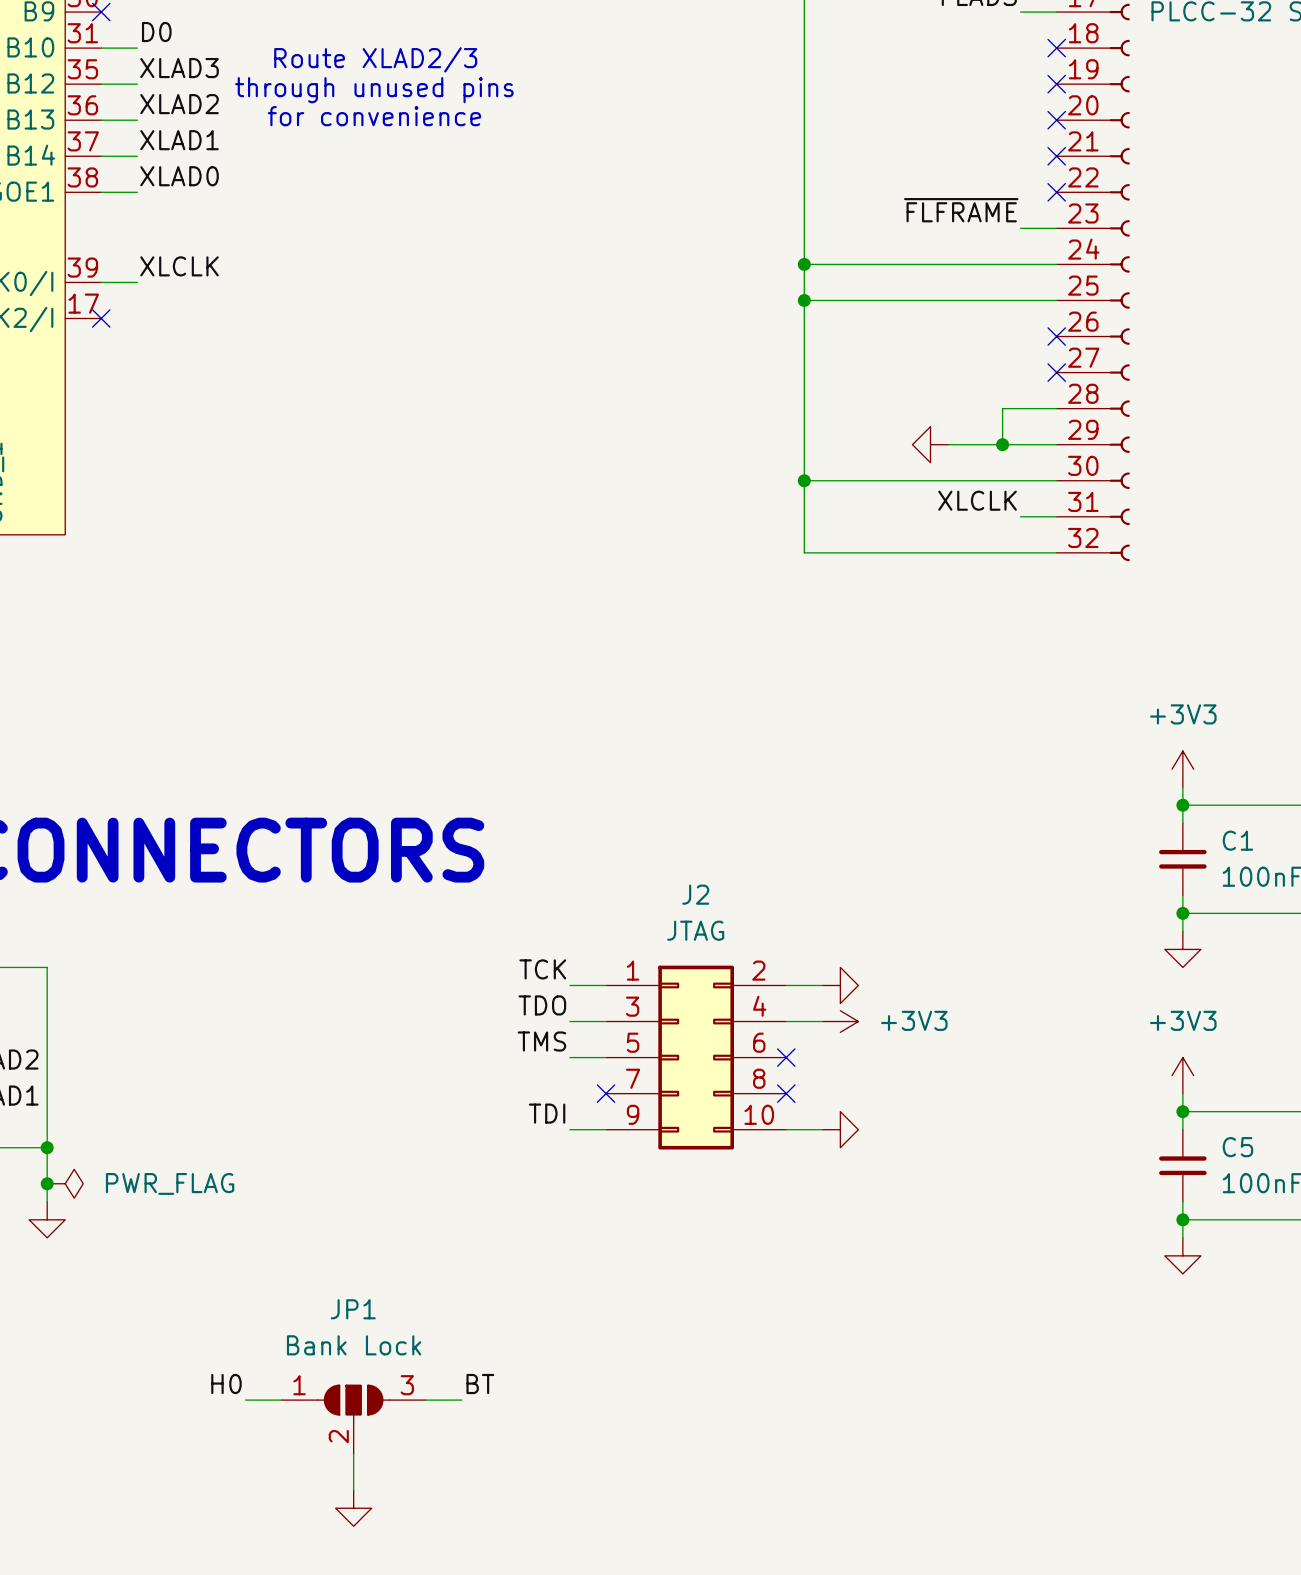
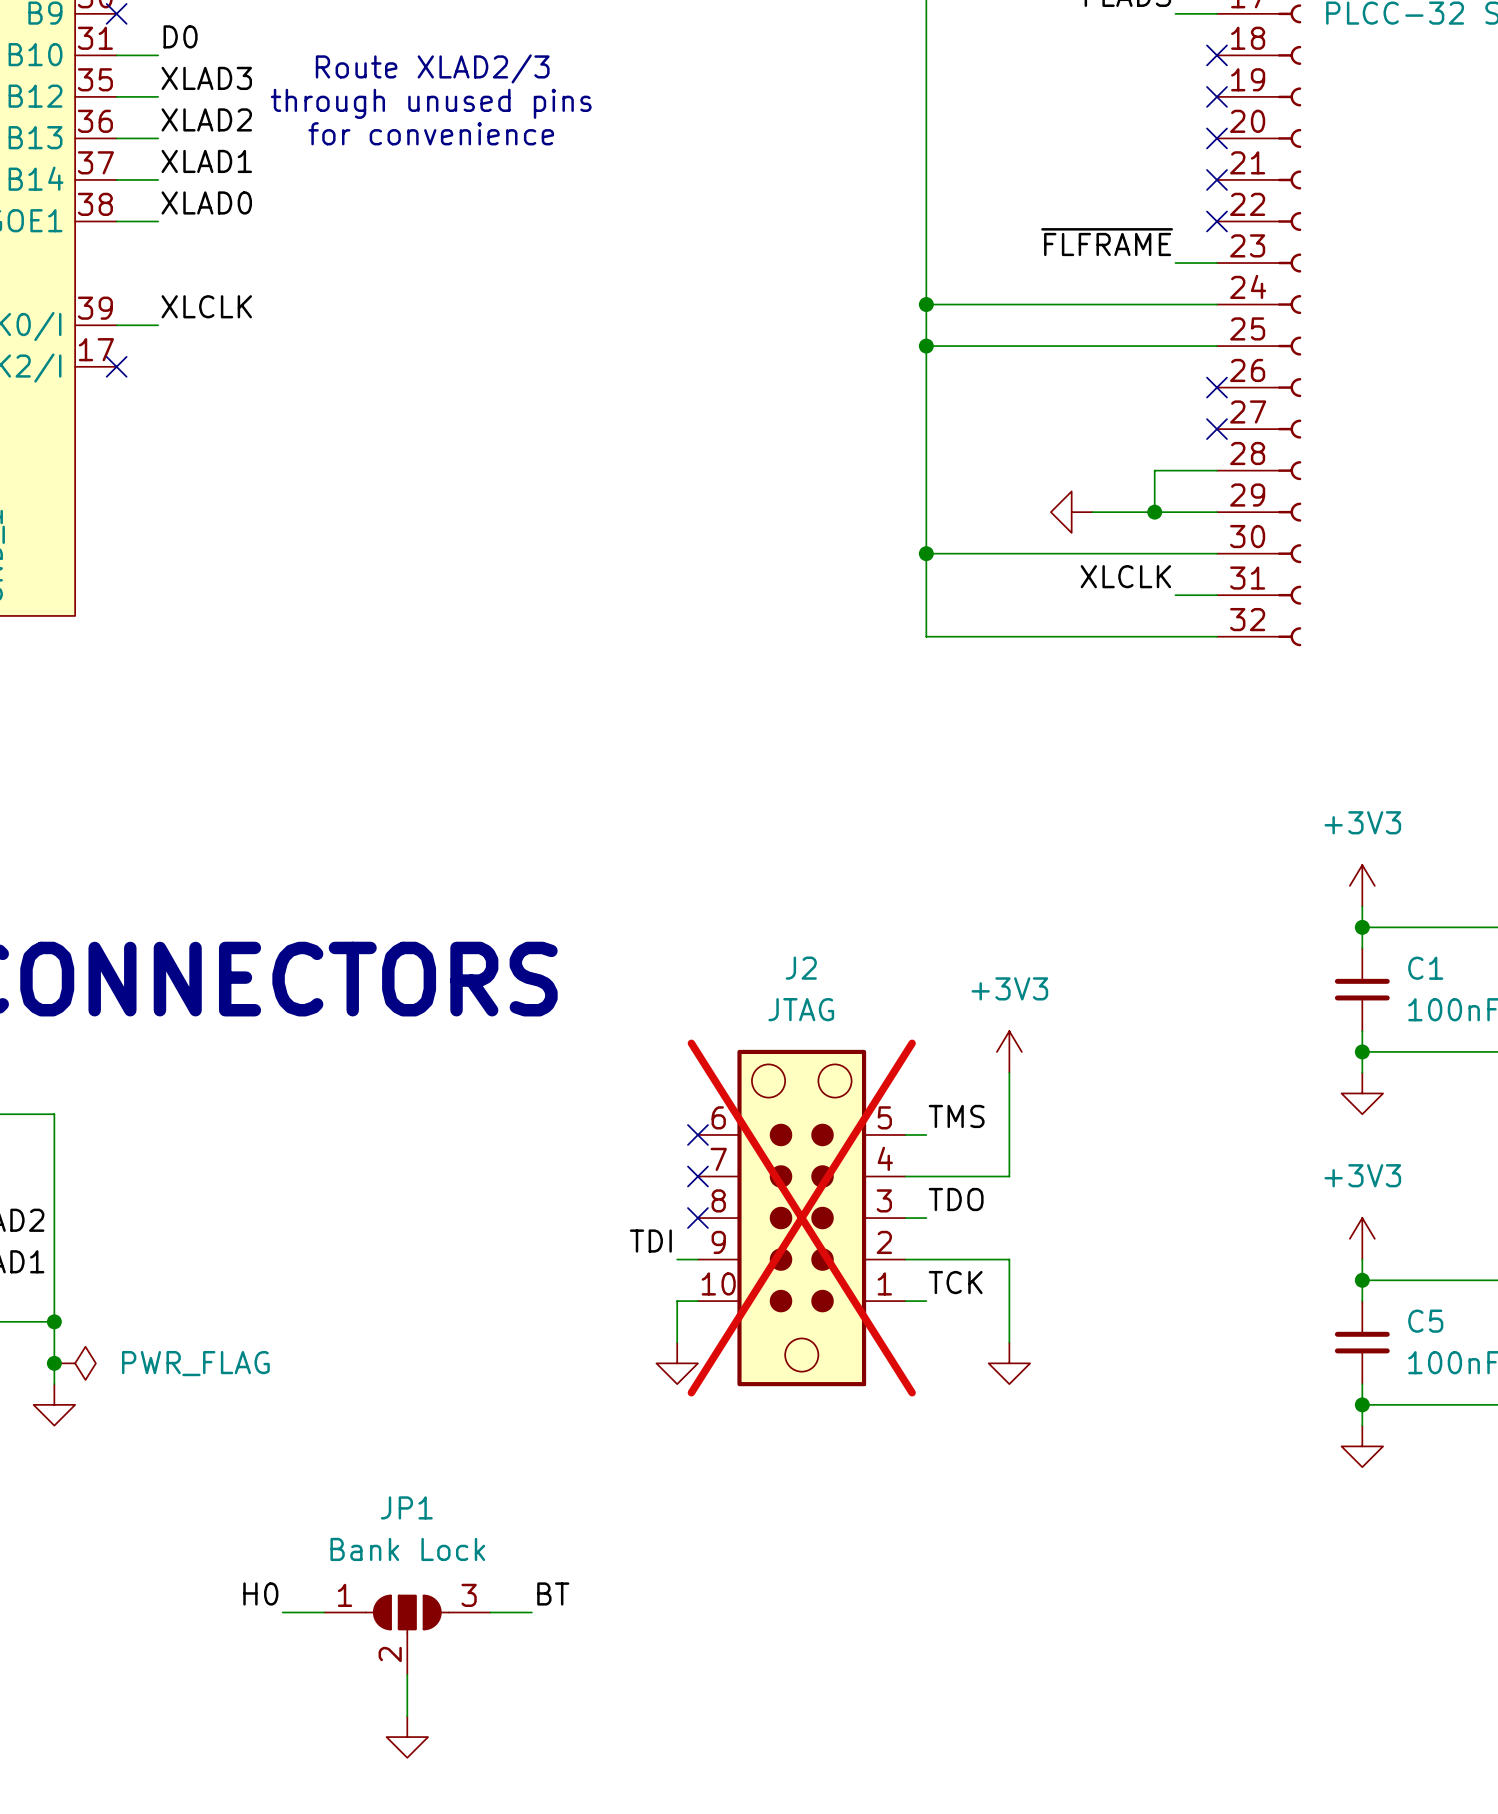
J2 name position: J2 (695, 894) -> J2 (801, 968)
J2 value position: JTAG (695, 930) -> JTAG (801, 1009)
wire: none -> (1009, 1072) (1009, 1176) (947, 1176)
J2 symbol: [606, 965, 787, 1150] -> [697, 1049, 906, 1387]
label position: TCK (542, 969) -> TCK (955, 1282)
wire: (569, 985) (606, 985) -> none
no-connect mark: none -> (697, 1134)
wire: (804, 985) (822, 985) -> (677, 1259) (697, 1259)
power symbol: (840, 985) -> none
label position: TDO (542, 1005) -> TDO (956, 1199)
wire: (569, 1021) (606, 1021) -> none
no-connect mark: none -> (697, 1176)
power symbol rotation: 0° (840, 1021) -> 90° counterclockwise (1009, 1051)
power symbol position: +3V3 (840, 1021) -> +3V3 (1009, 1051)
label position: TMS (541, 1041) -> TMS (956, 1116)
wire: (569, 1057) (606, 1057) -> none
no-connect mark: none -> (697, 1218)
J2 do-not-place cross: none -> (801, 1218)
no-connect mark: (786, 1057) -> none
no-connect mark: (606, 1093) -> none
wire: none -> (905, 1259) (1009, 1259) (1009, 1342)
no-connect mark: (786, 1093) -> none
label position: TDI (547, 1113) -> TDI (650, 1241)
wire: (569, 1129) (587, 1129) -> (677, 1342) (677, 1301)
wire: (804, 1129) (822, 1129) -> (905, 1218) (926, 1218)
power symbol rotation: 0° (840, 1129) -> 90° clockwise (1009, 1363)
power symbol position: (840, 1129) -> (1009, 1363)
power symbol: none -> (677, 1363)

